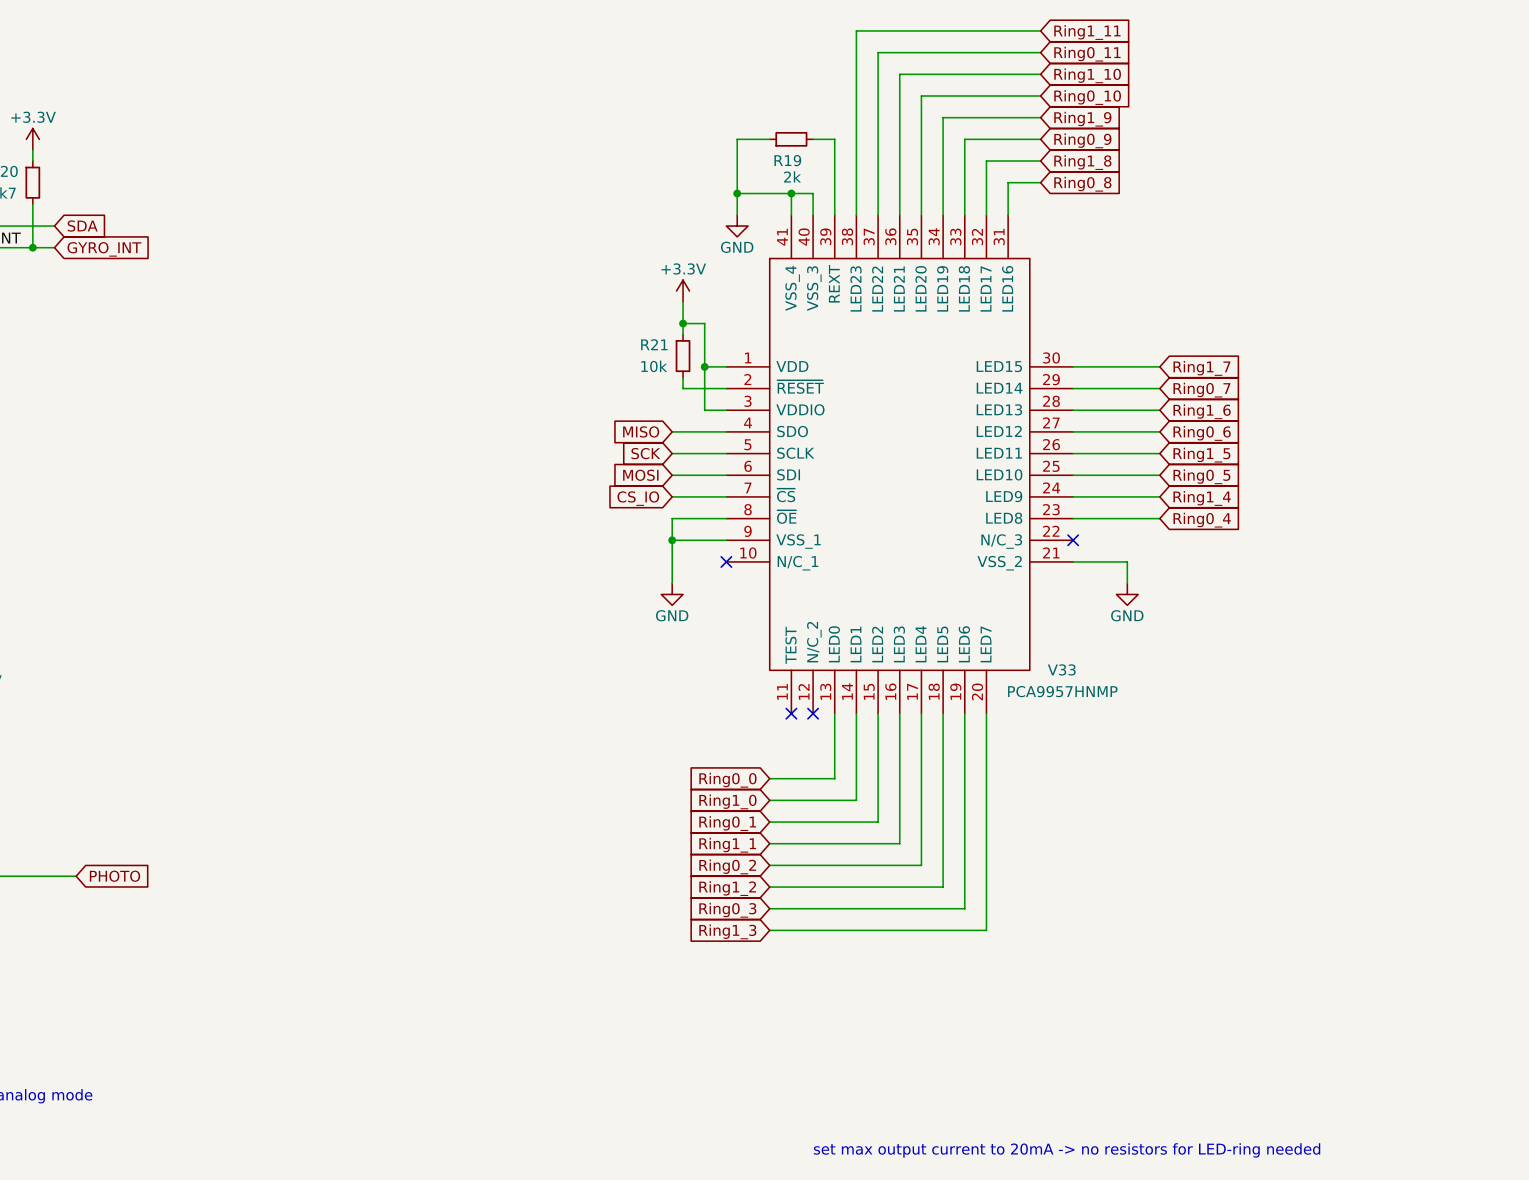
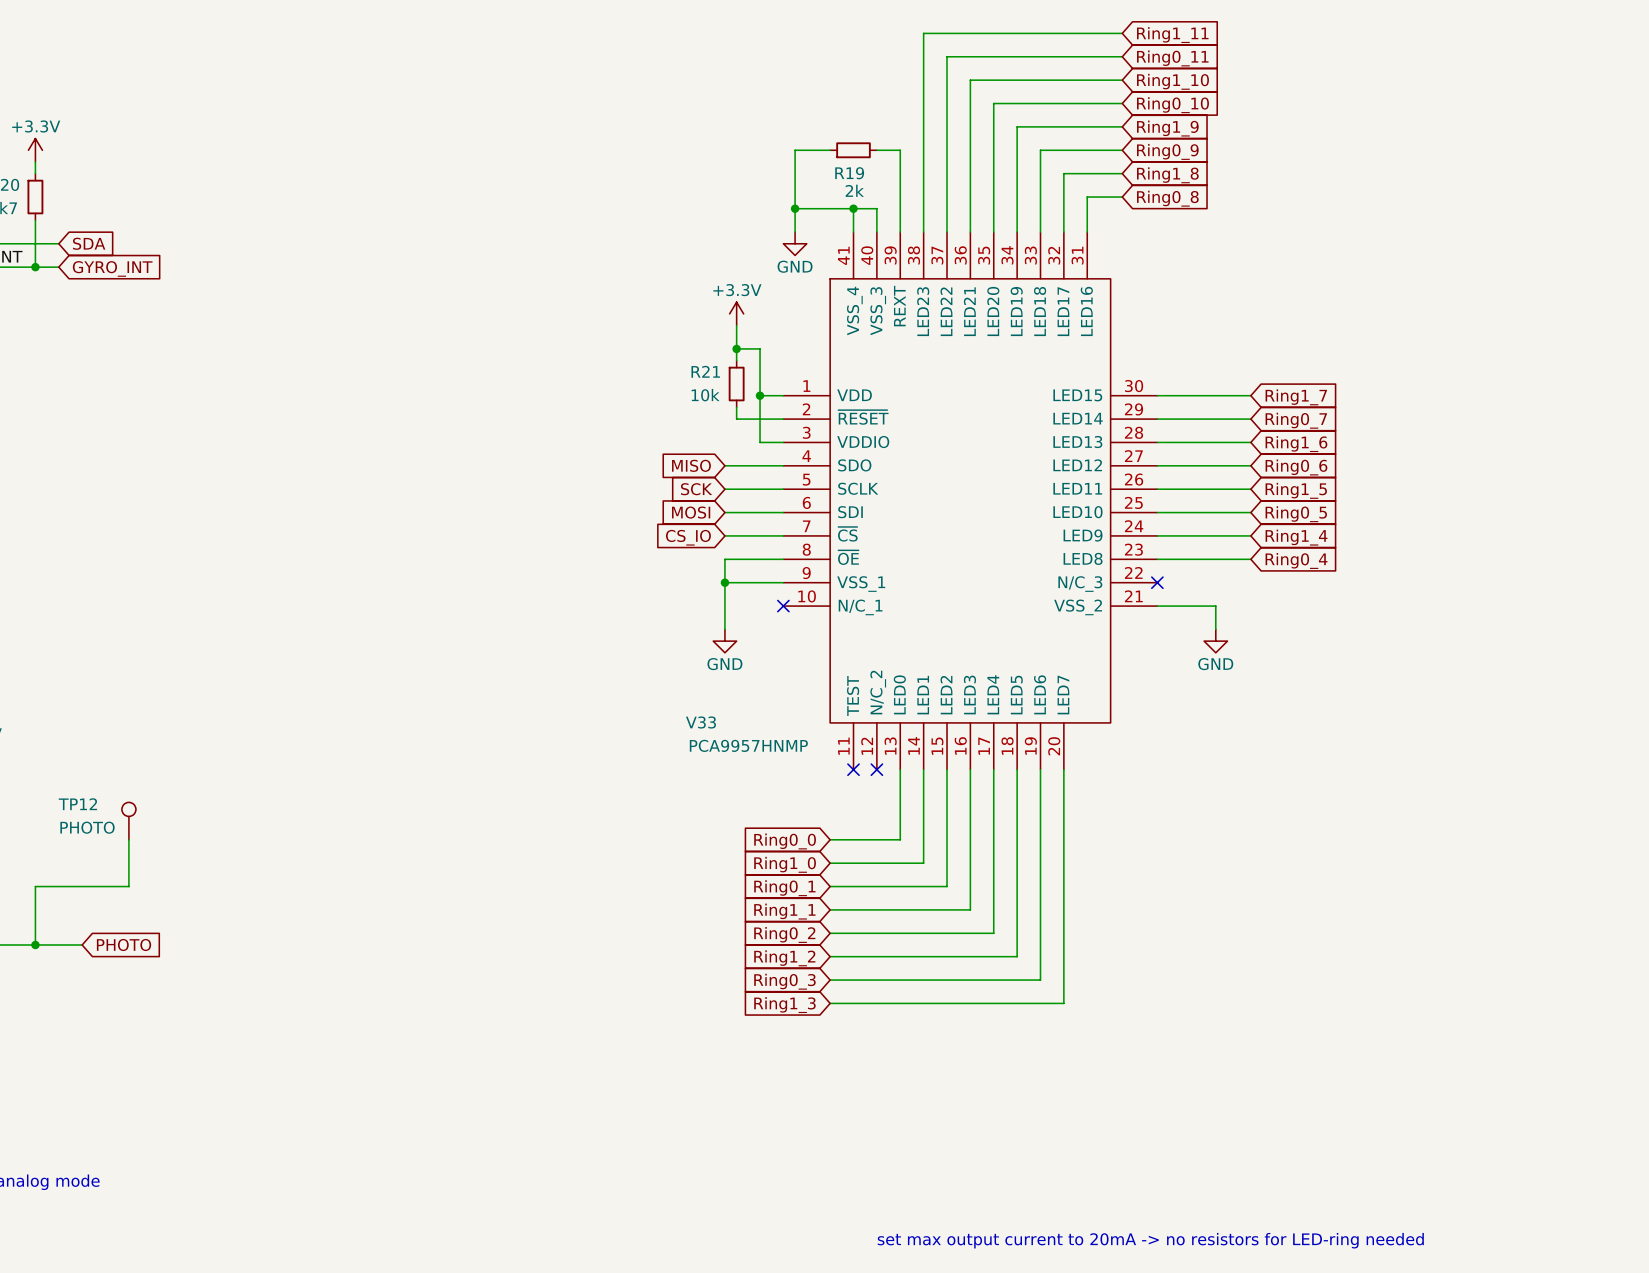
V33 name position: V33 (1061, 669) -> V33 (701, 722)
V33 value position: PCA9957HNMP (1062, 691) -> PCA9957HNMP (748, 745)
TP12: none -> PHOTO (128, 821)
wire: none -> (128, 839) (128, 886) (35, 886) (35, 944)
junction: none -> (35, 944)

